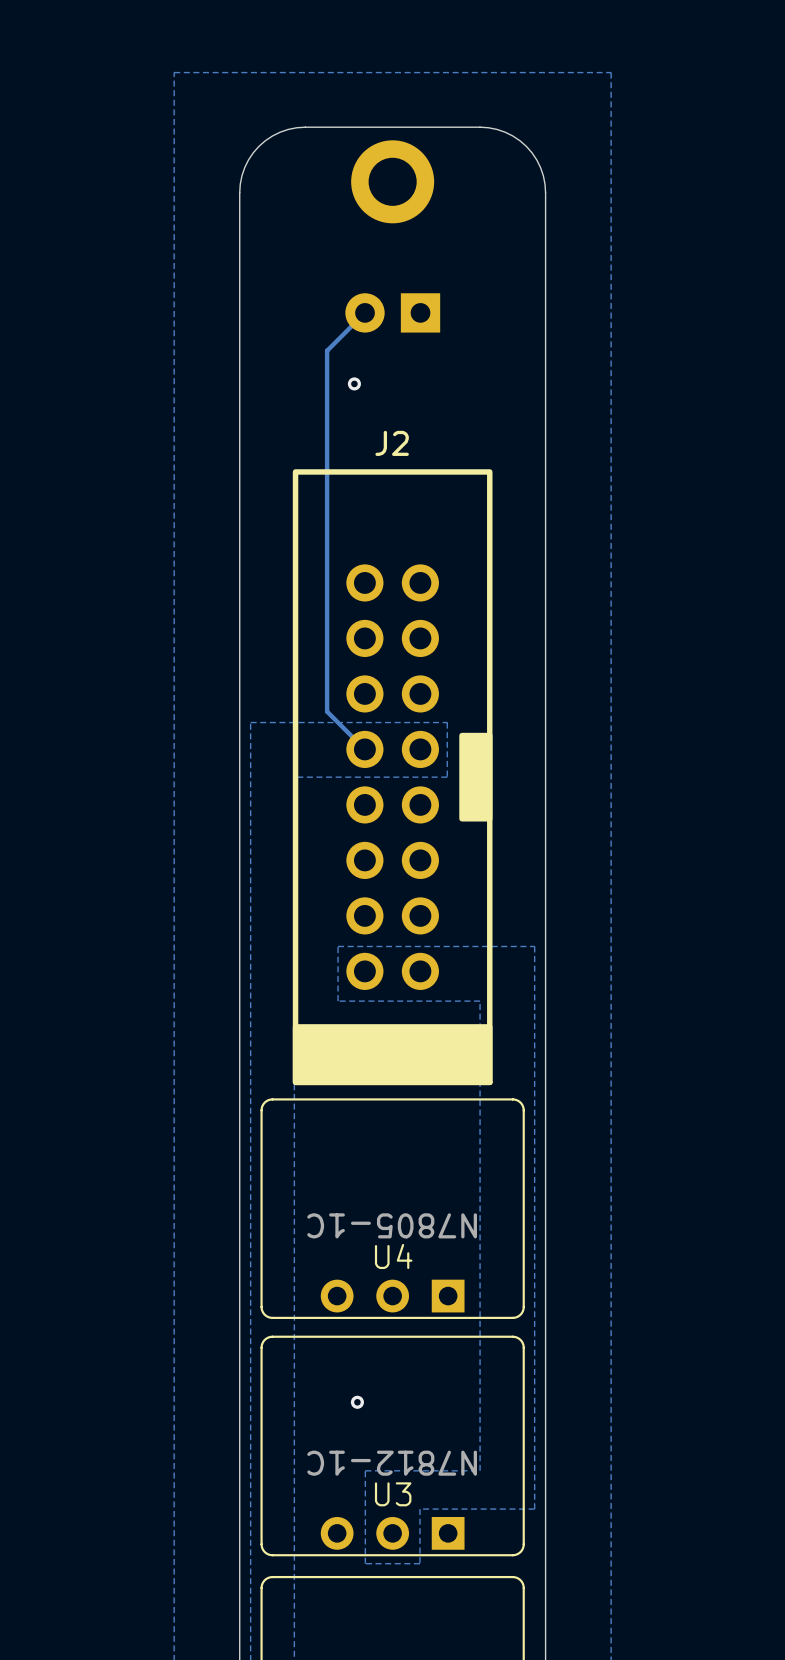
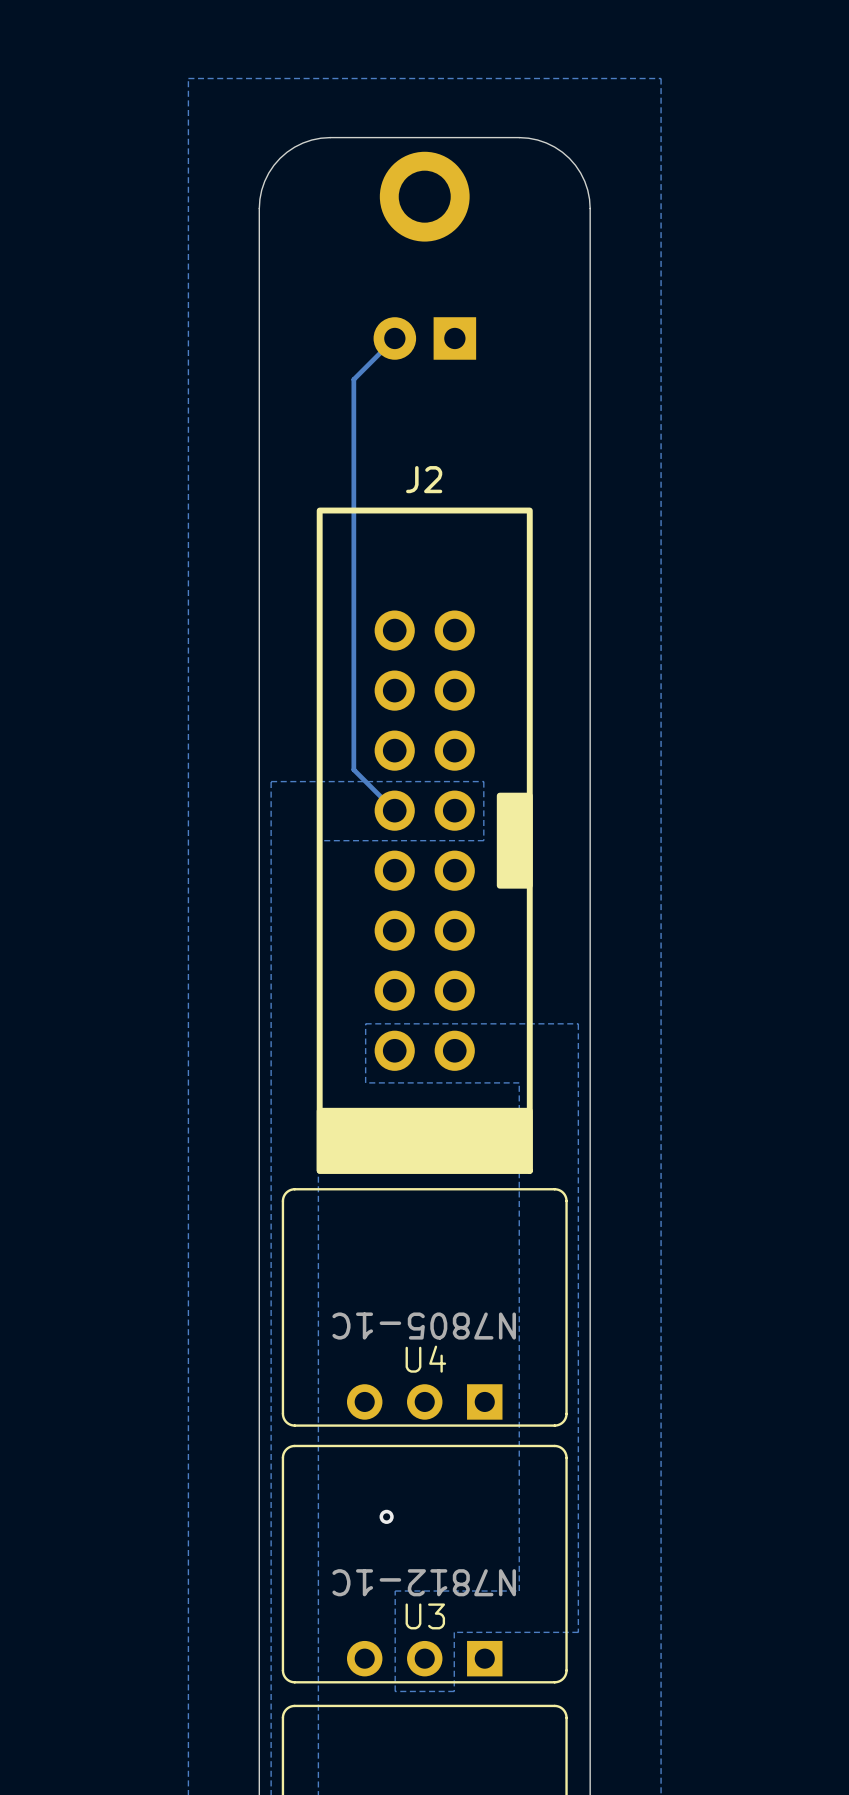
via: (354, 383) -> none

